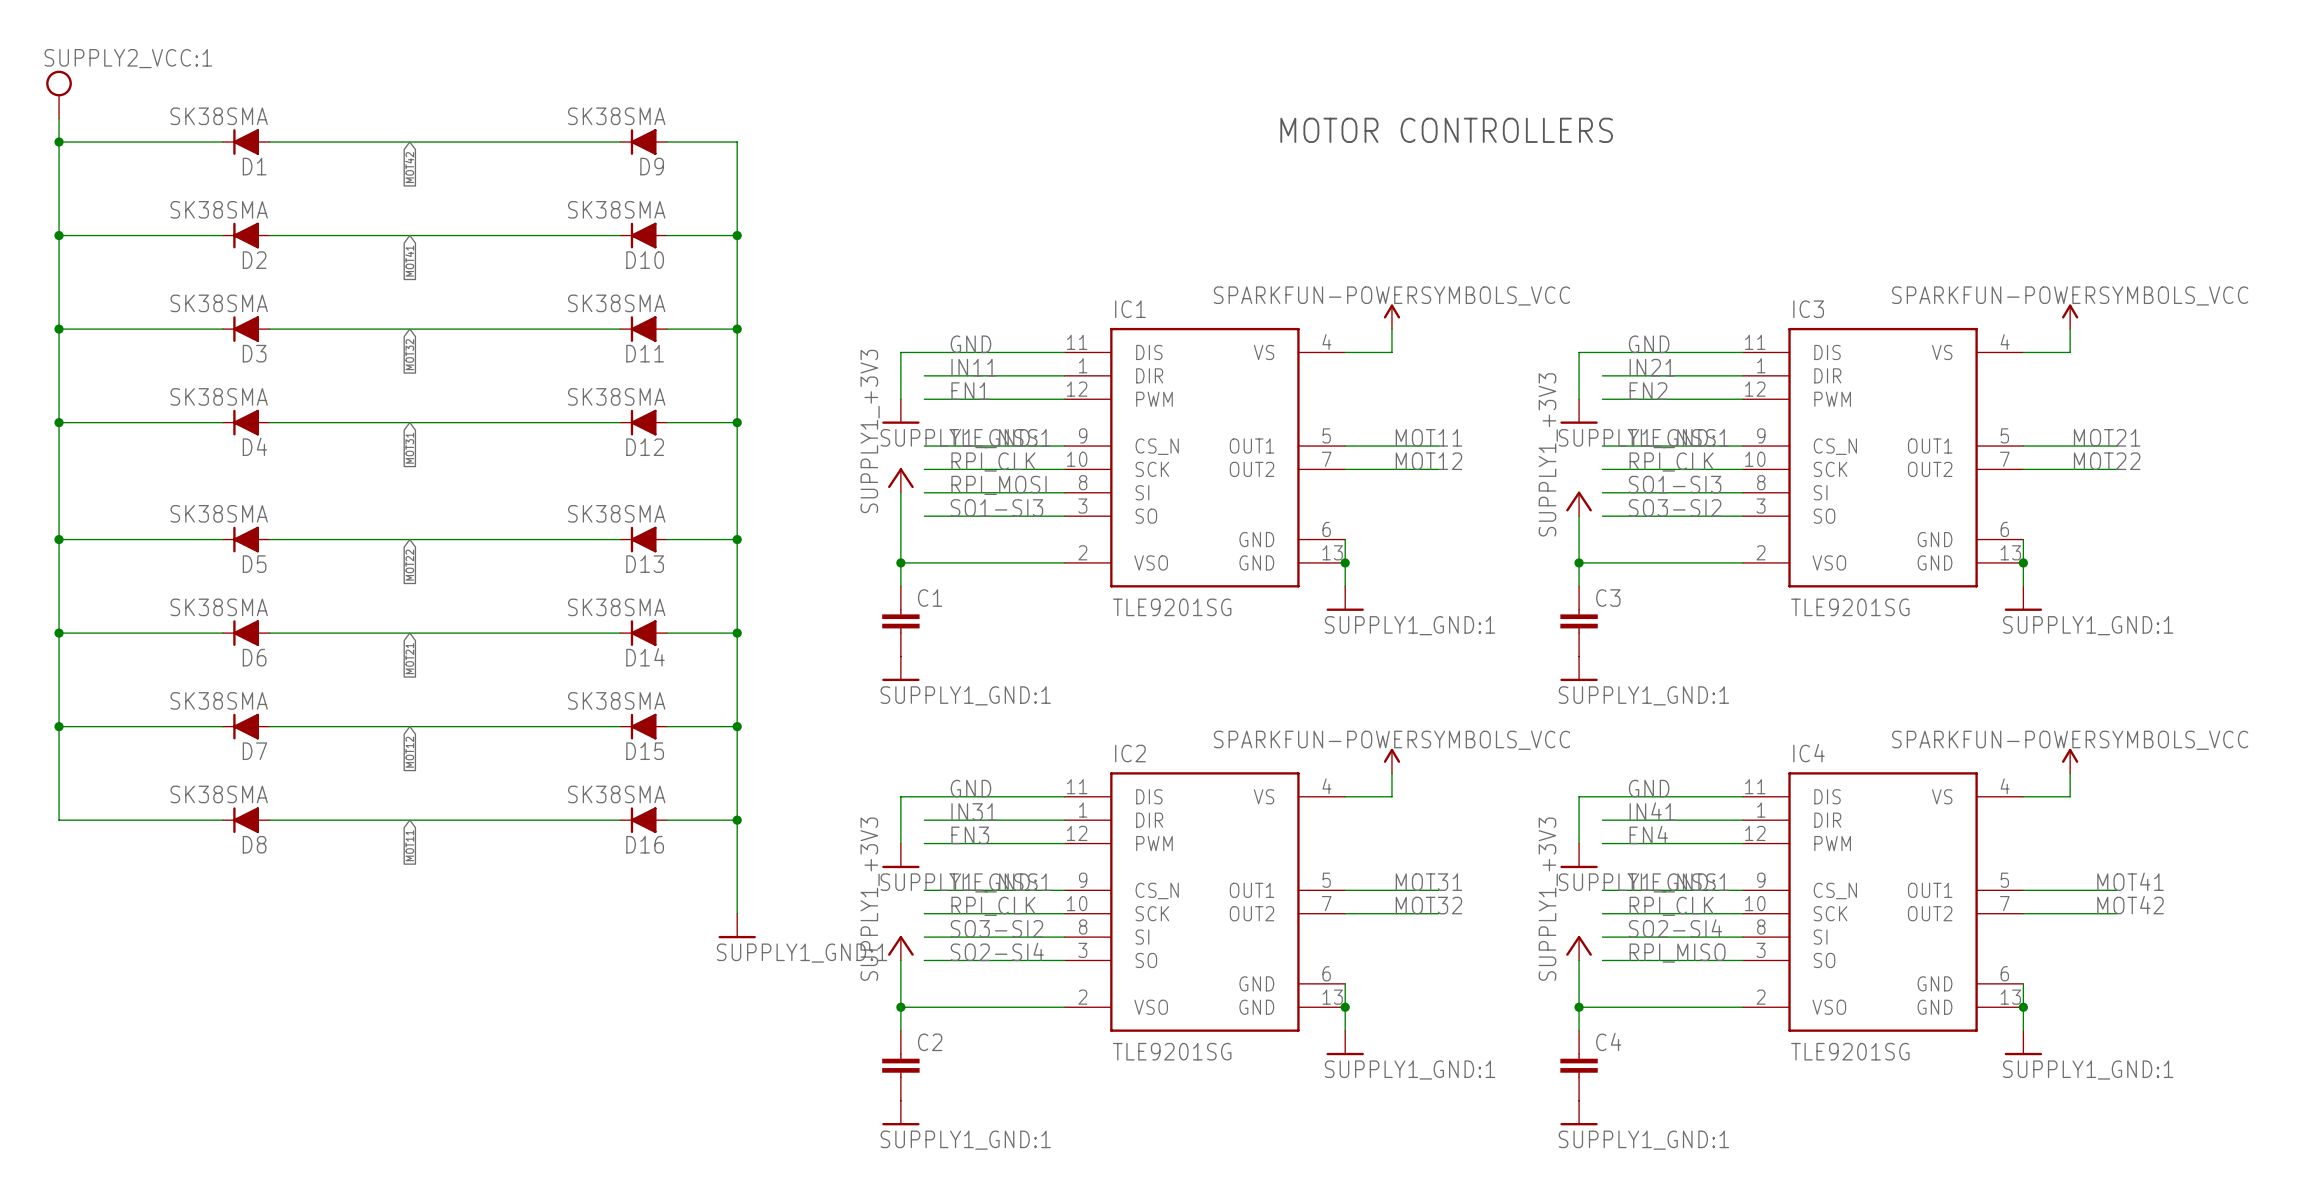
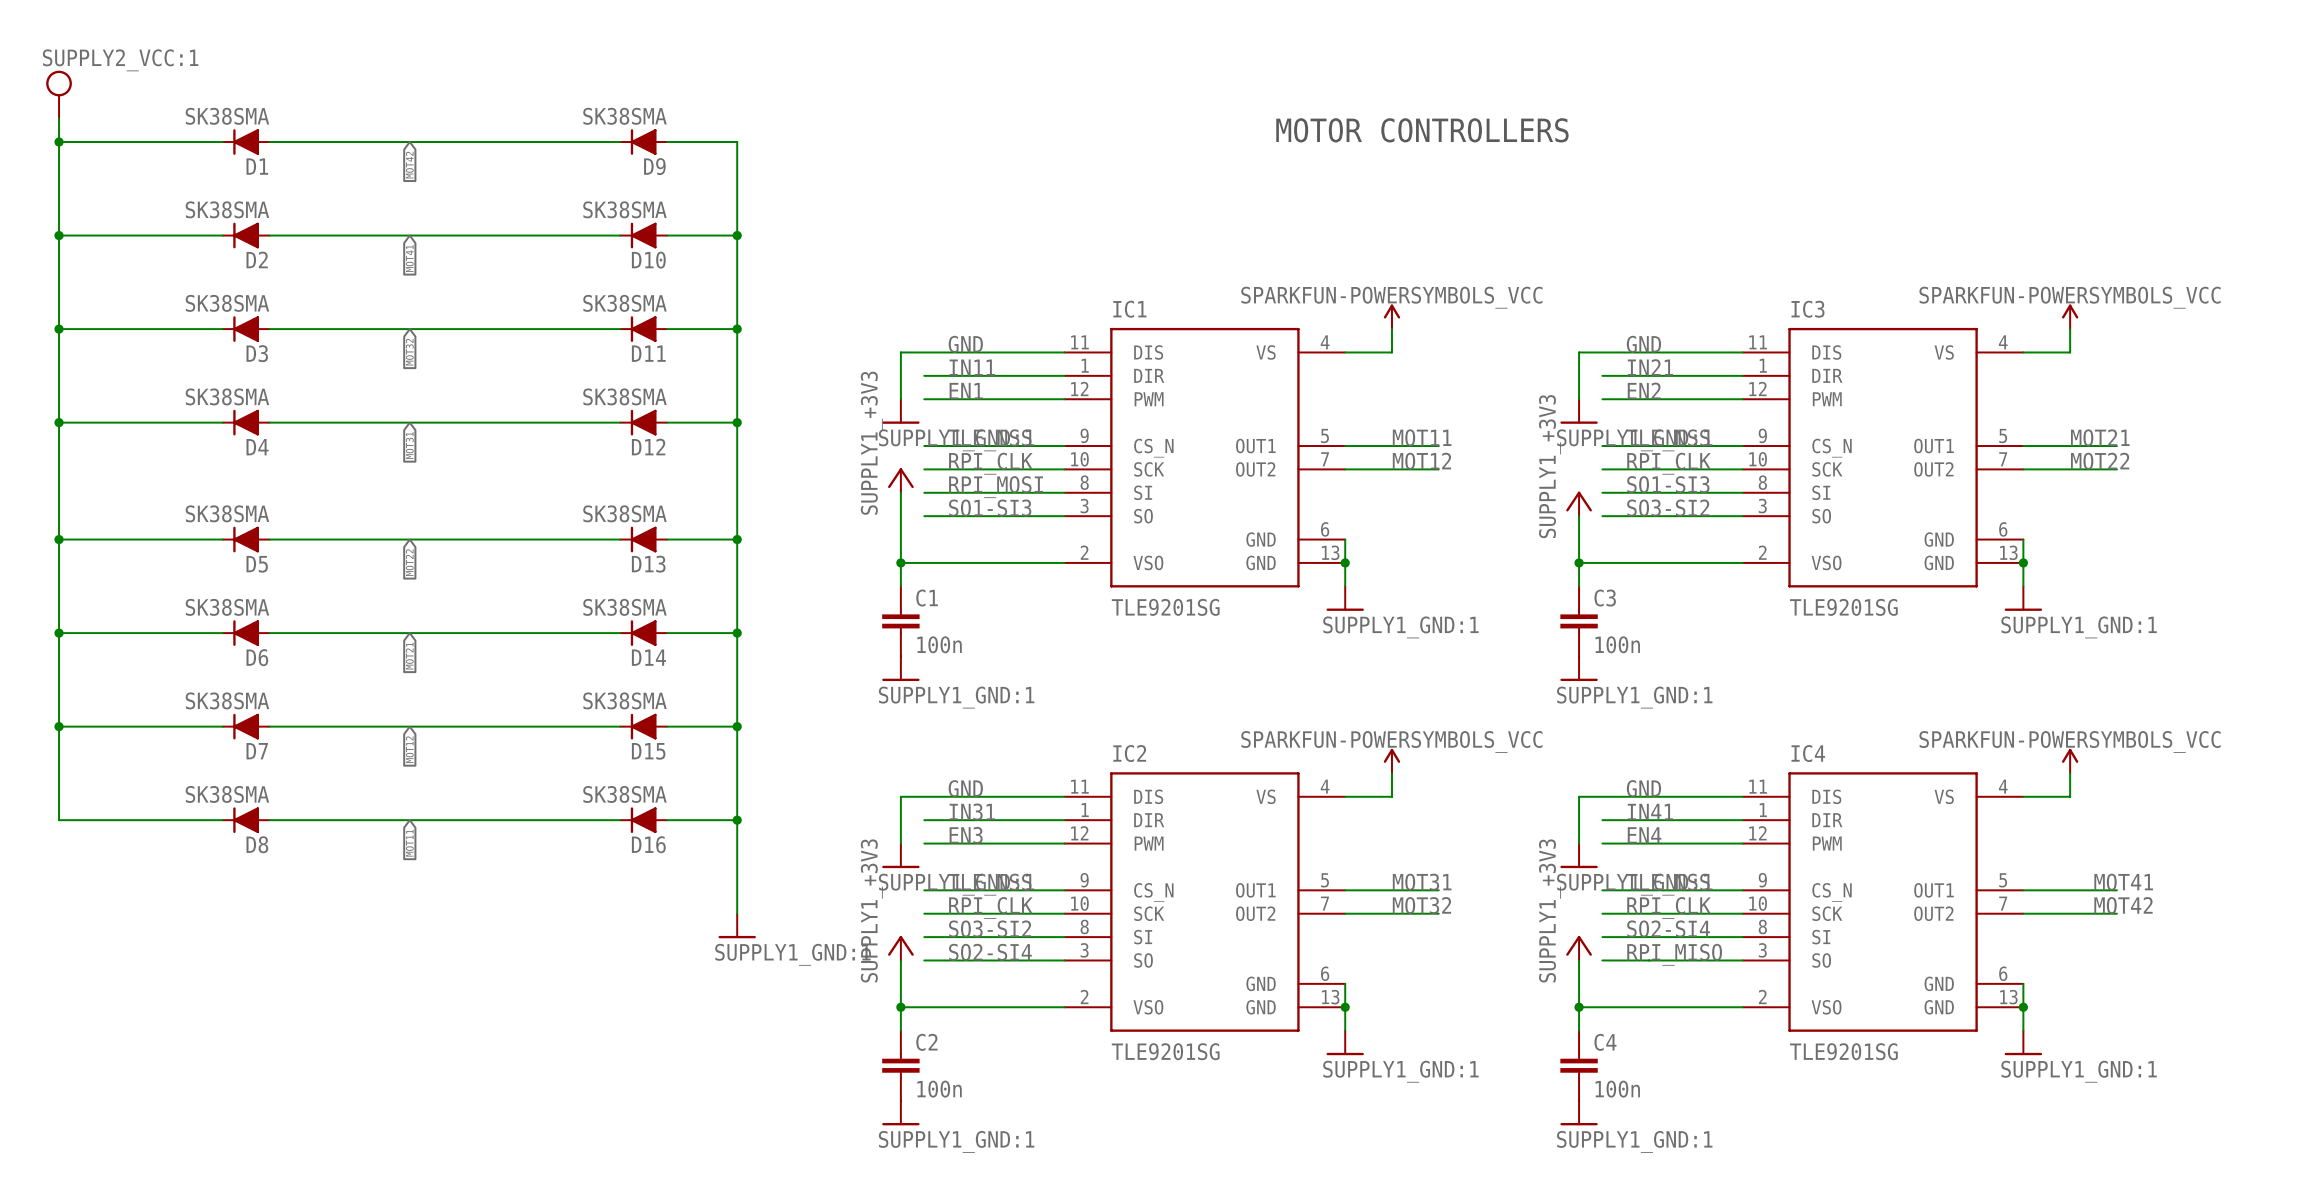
C1 value: none -> 100n (939, 644)
C3 value: none -> 100n (1617, 644)
C2 value: none -> 100n (939, 1089)
C4 value: none -> 100n (1617, 1089)

